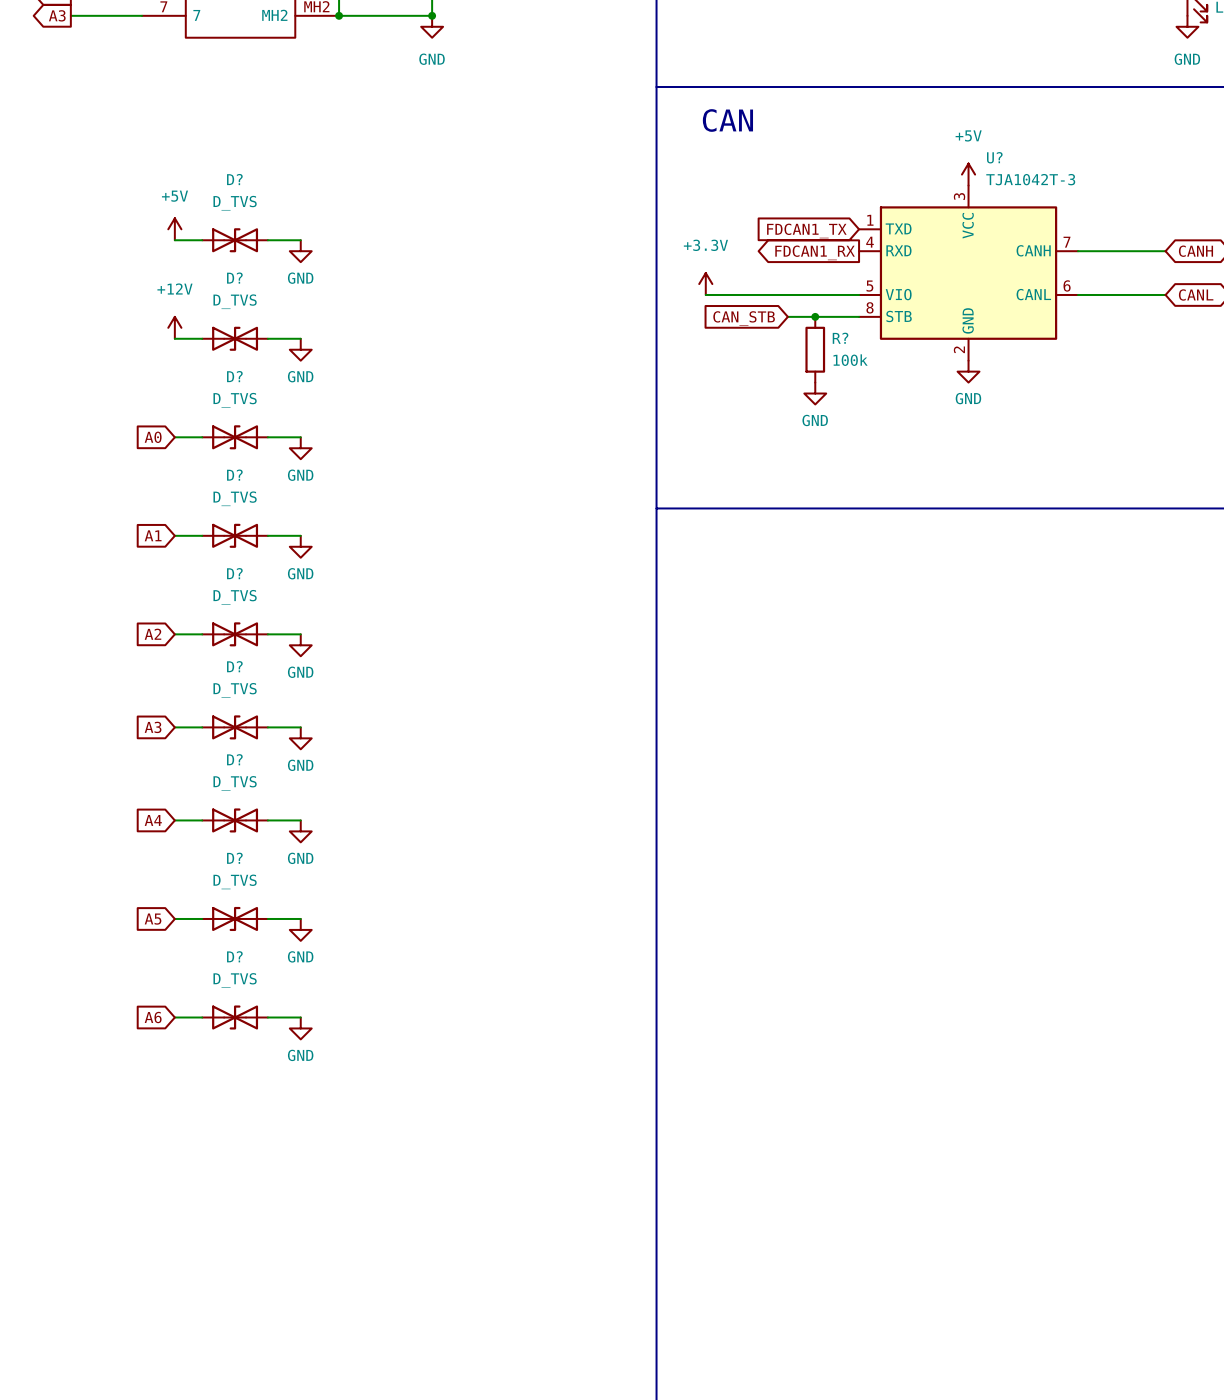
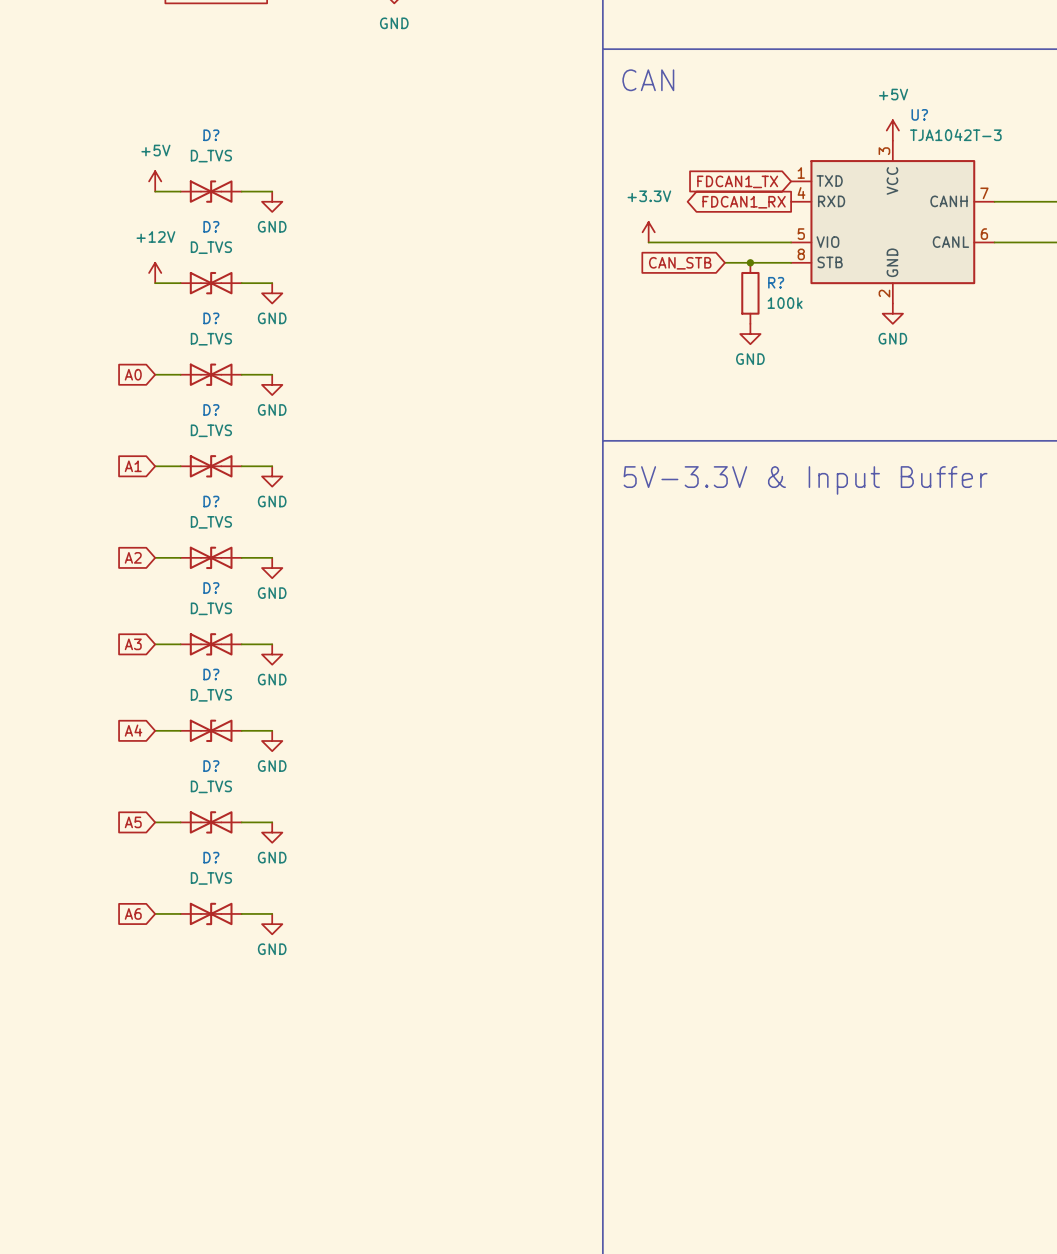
text position: CAN (727, 120) -> CAN (648, 80)
text: none -> 5V-3.3V & Input Buffer (805, 480)

